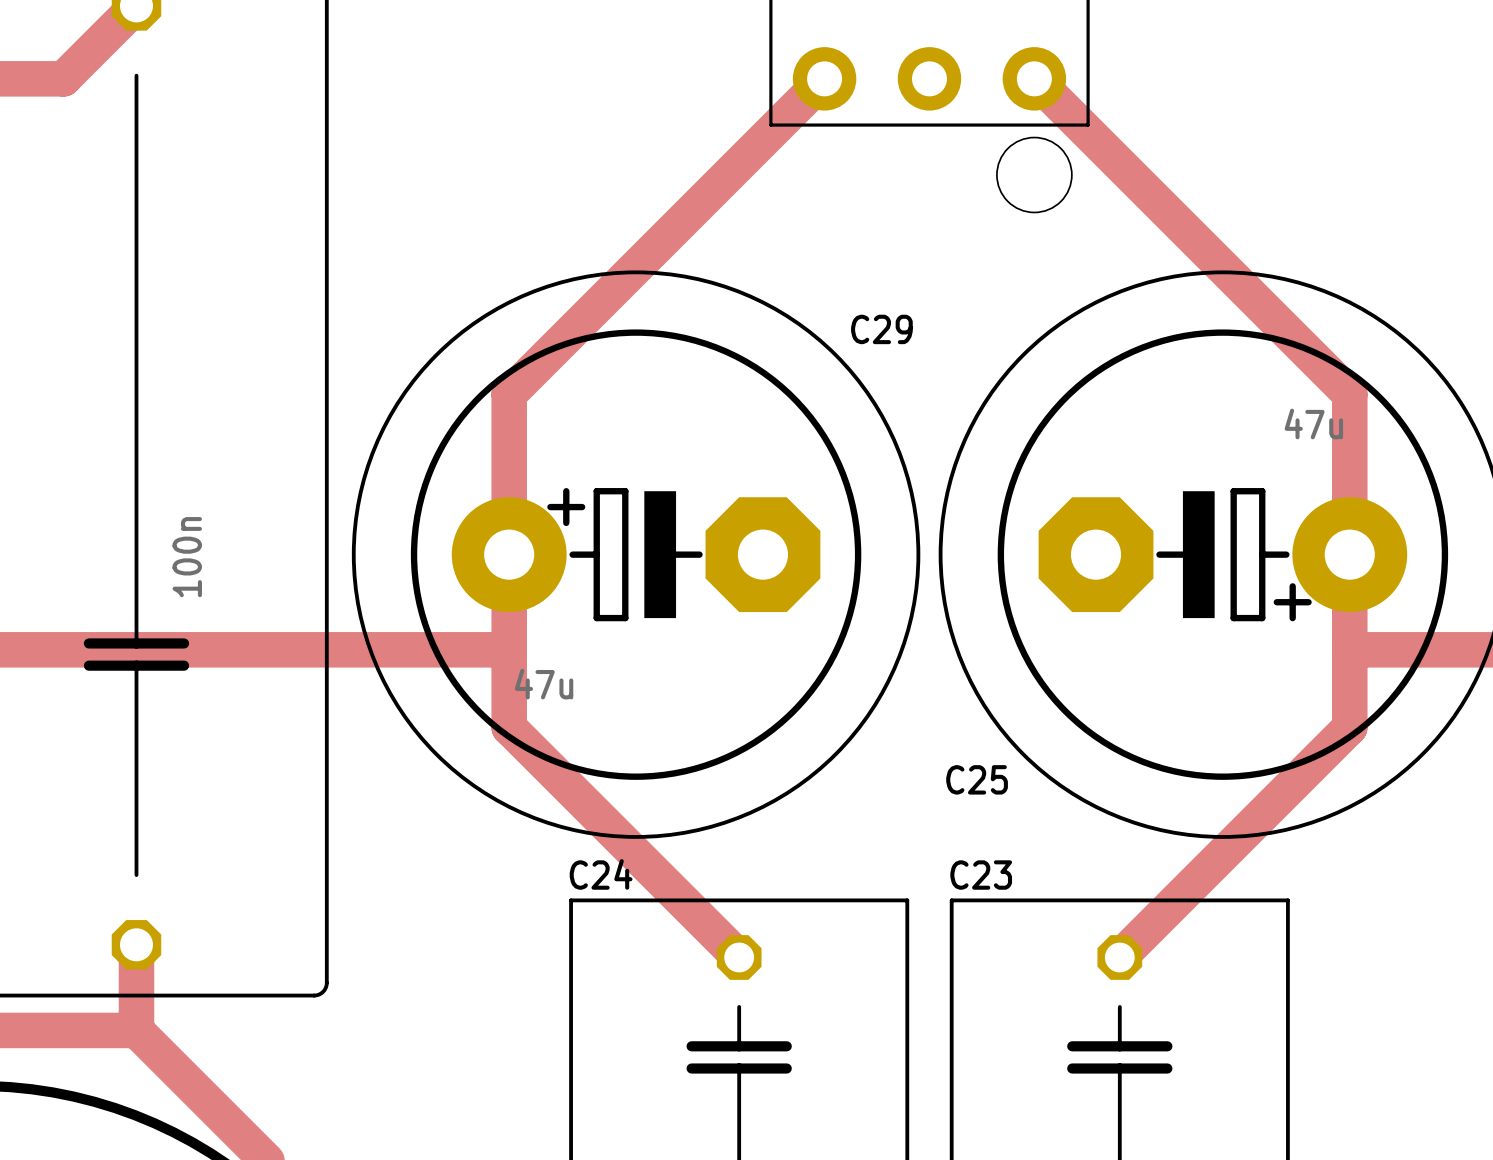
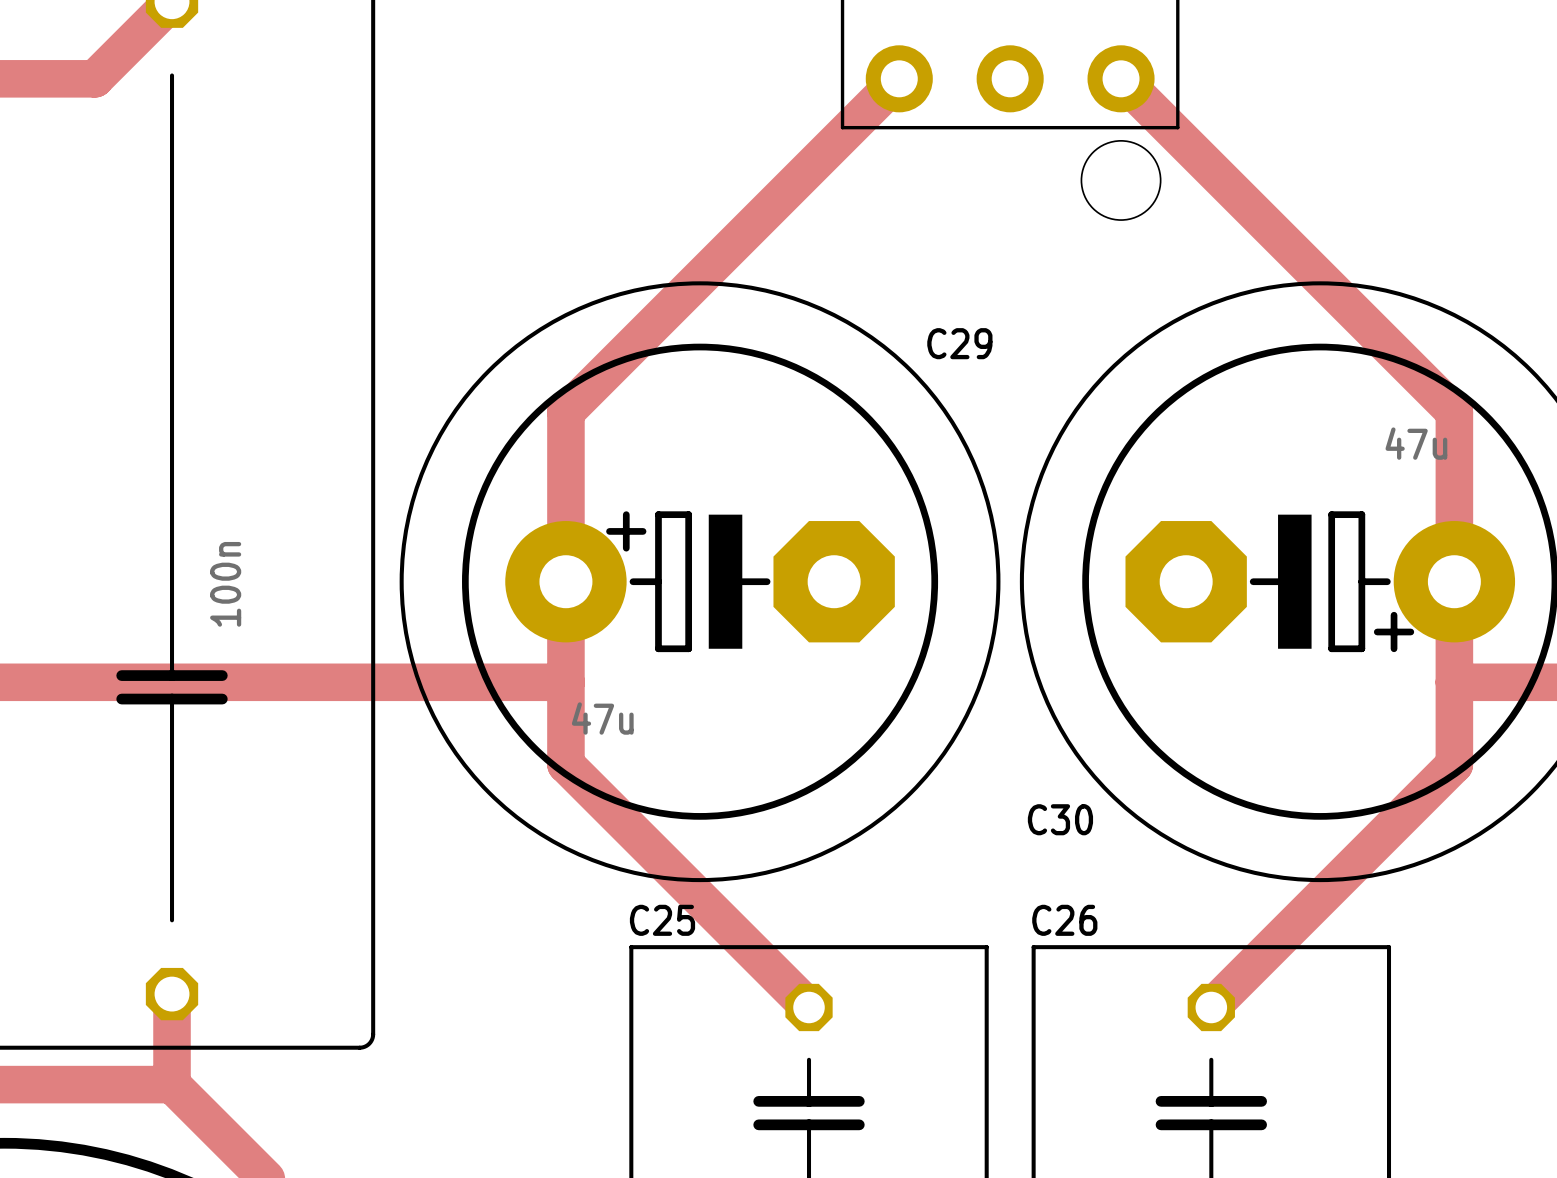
C25 name: C25 (977, 779) -> C30 (1060, 819)
C24 name: C24 (601, 874) -> C25 (662, 920)
C23 name: C23 (981, 875) -> C26 (1064, 920)

